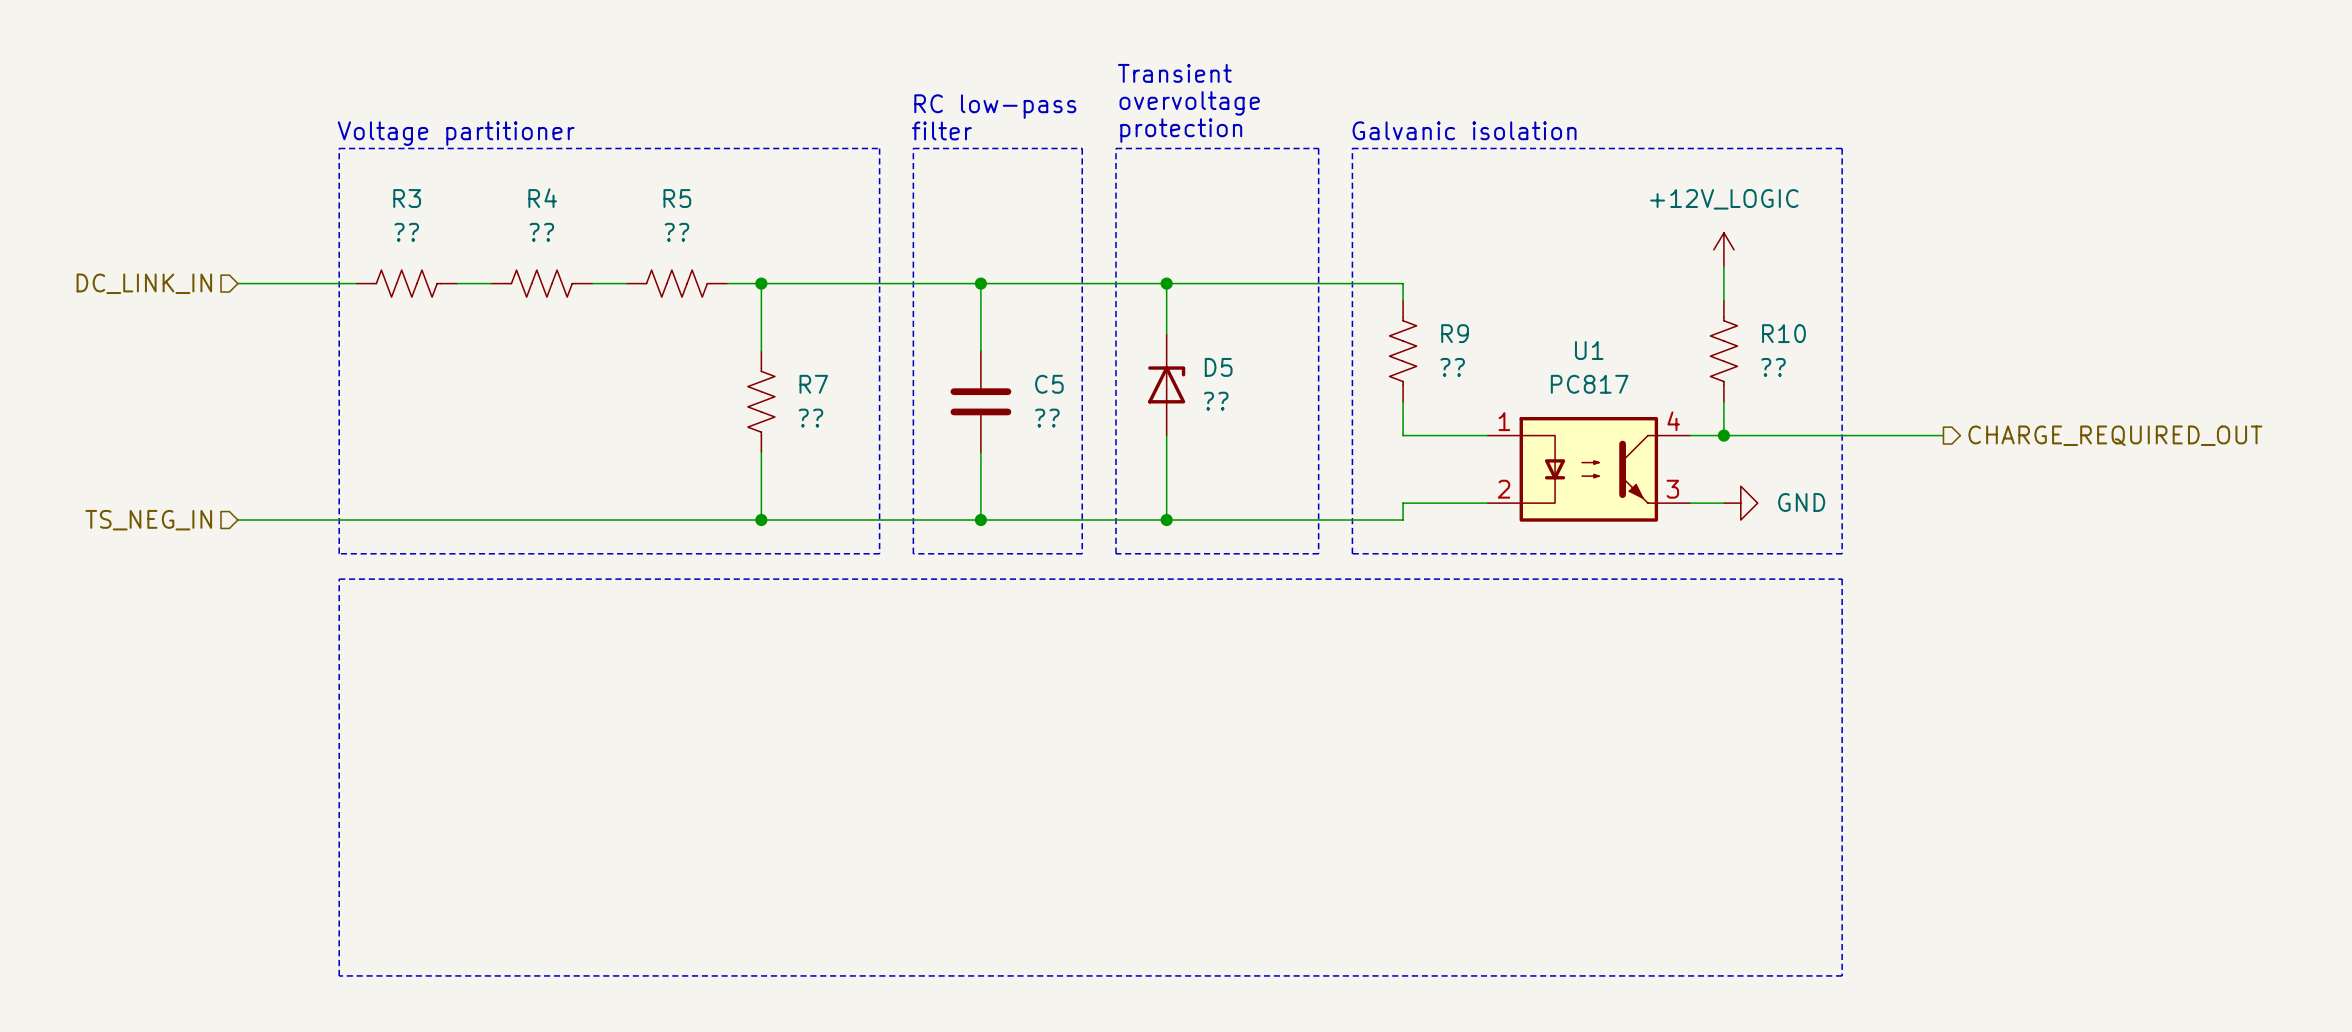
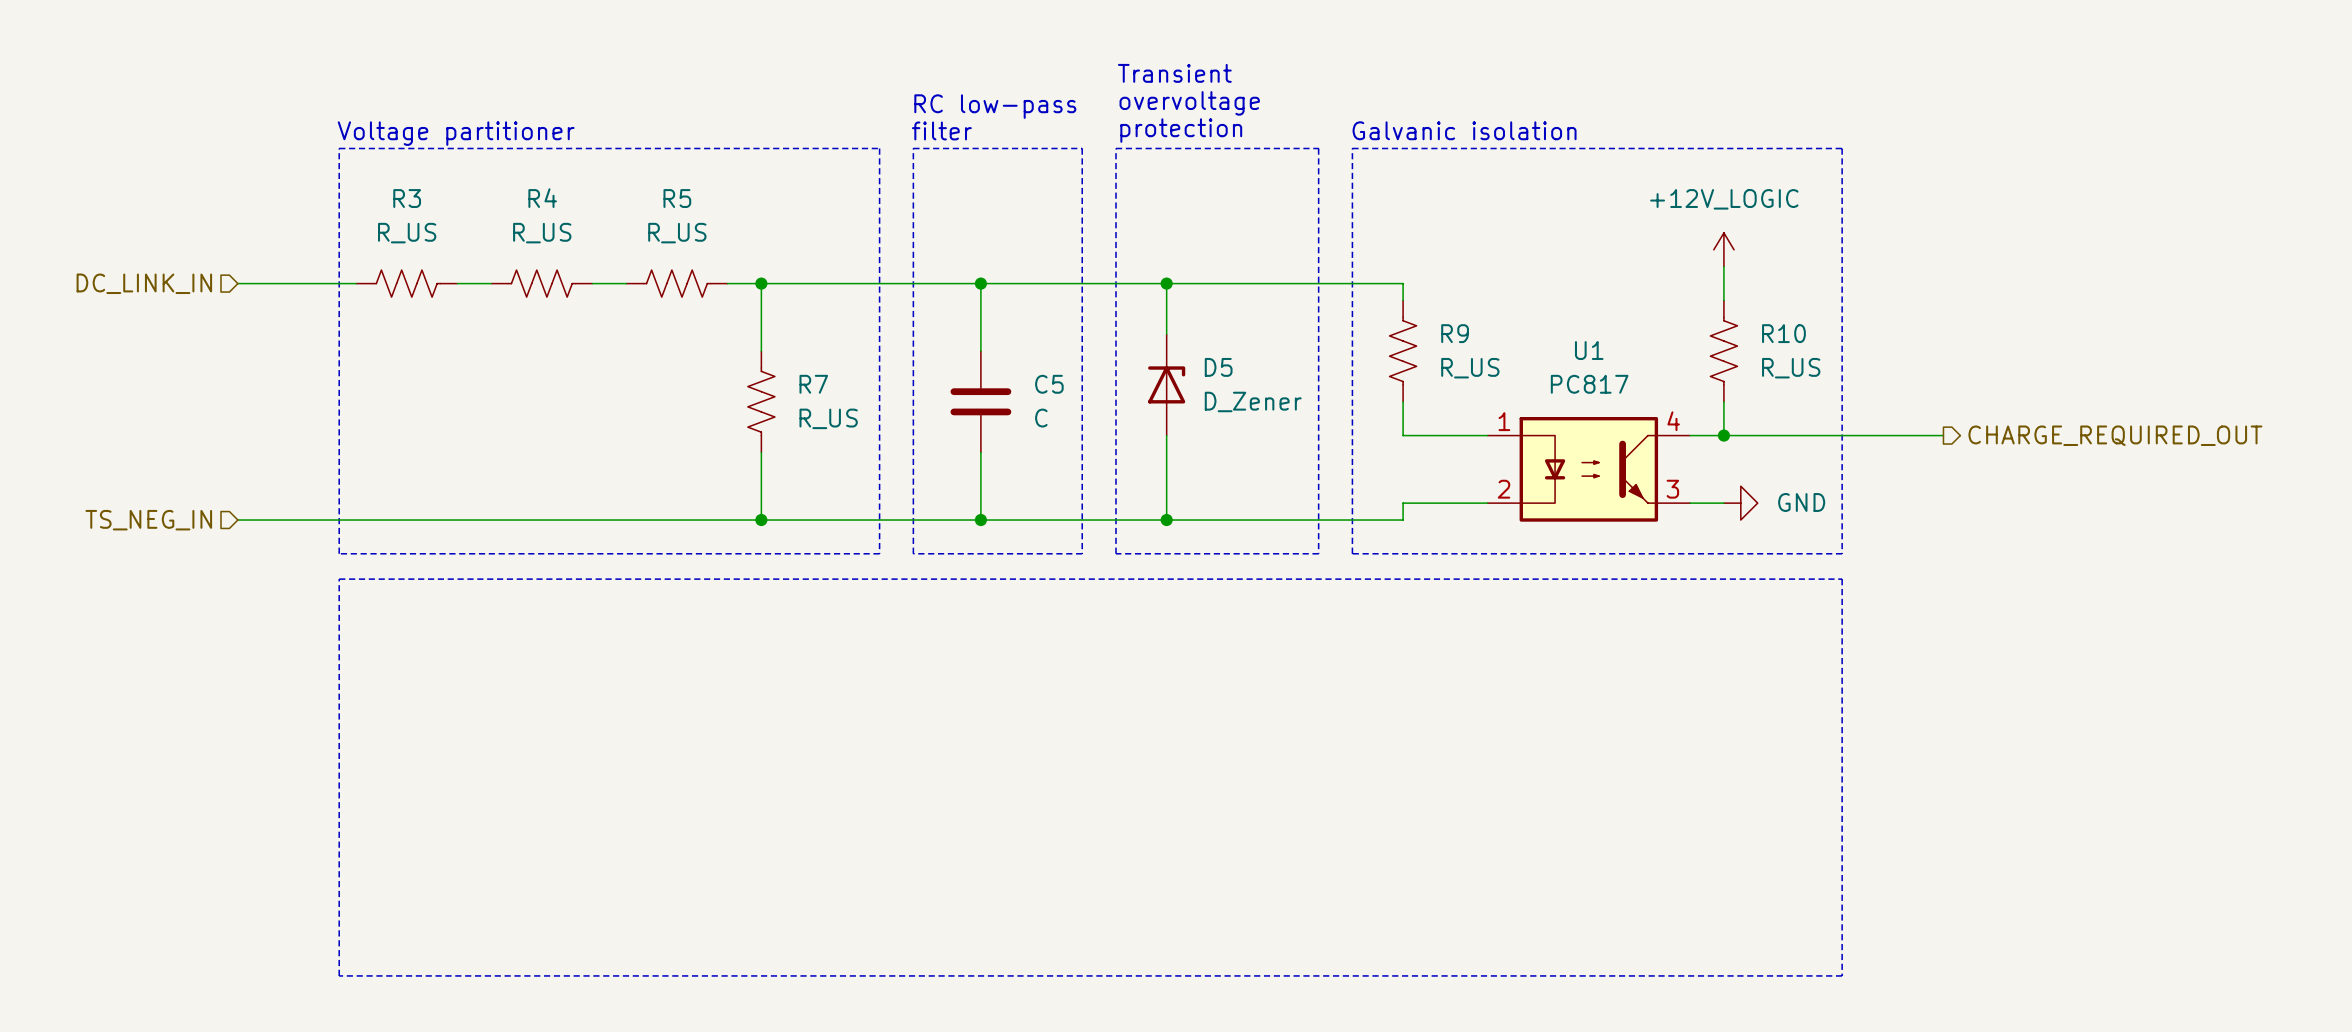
R3 value: ?? (406, 232) -> R_US (407, 233)
R4 value: ?? (541, 232) -> R_US (542, 233)
R5 value: ?? (676, 232) -> R_US (677, 233)
R9 value: ?? (1452, 367) -> R_US (1470, 368)
R10 value: ?? (1773, 367) -> R_US (1791, 368)
D5 value: ?? (1216, 401) -> D_Zener (1253, 401)
R7 value: ?? (810, 418) -> R_US (828, 418)
C5 value: ?? (1047, 418) -> C (1041, 418)

